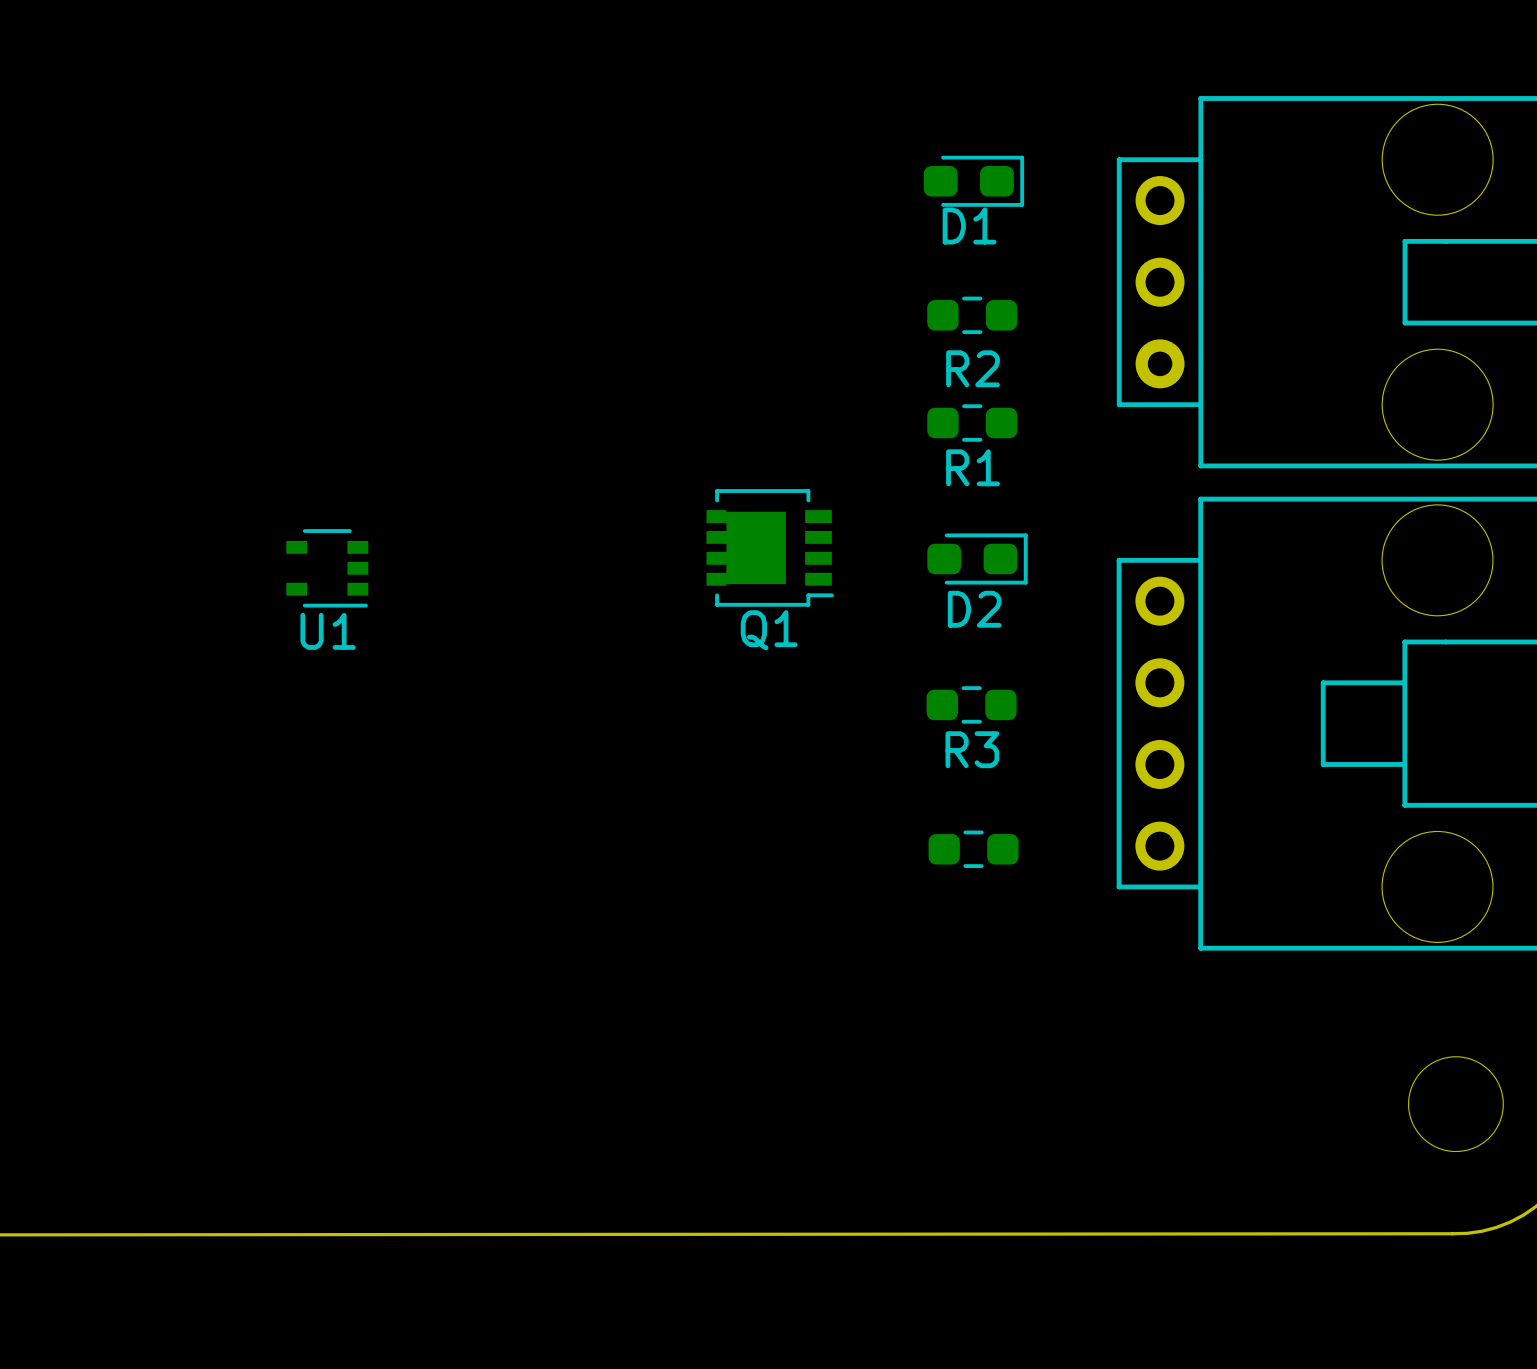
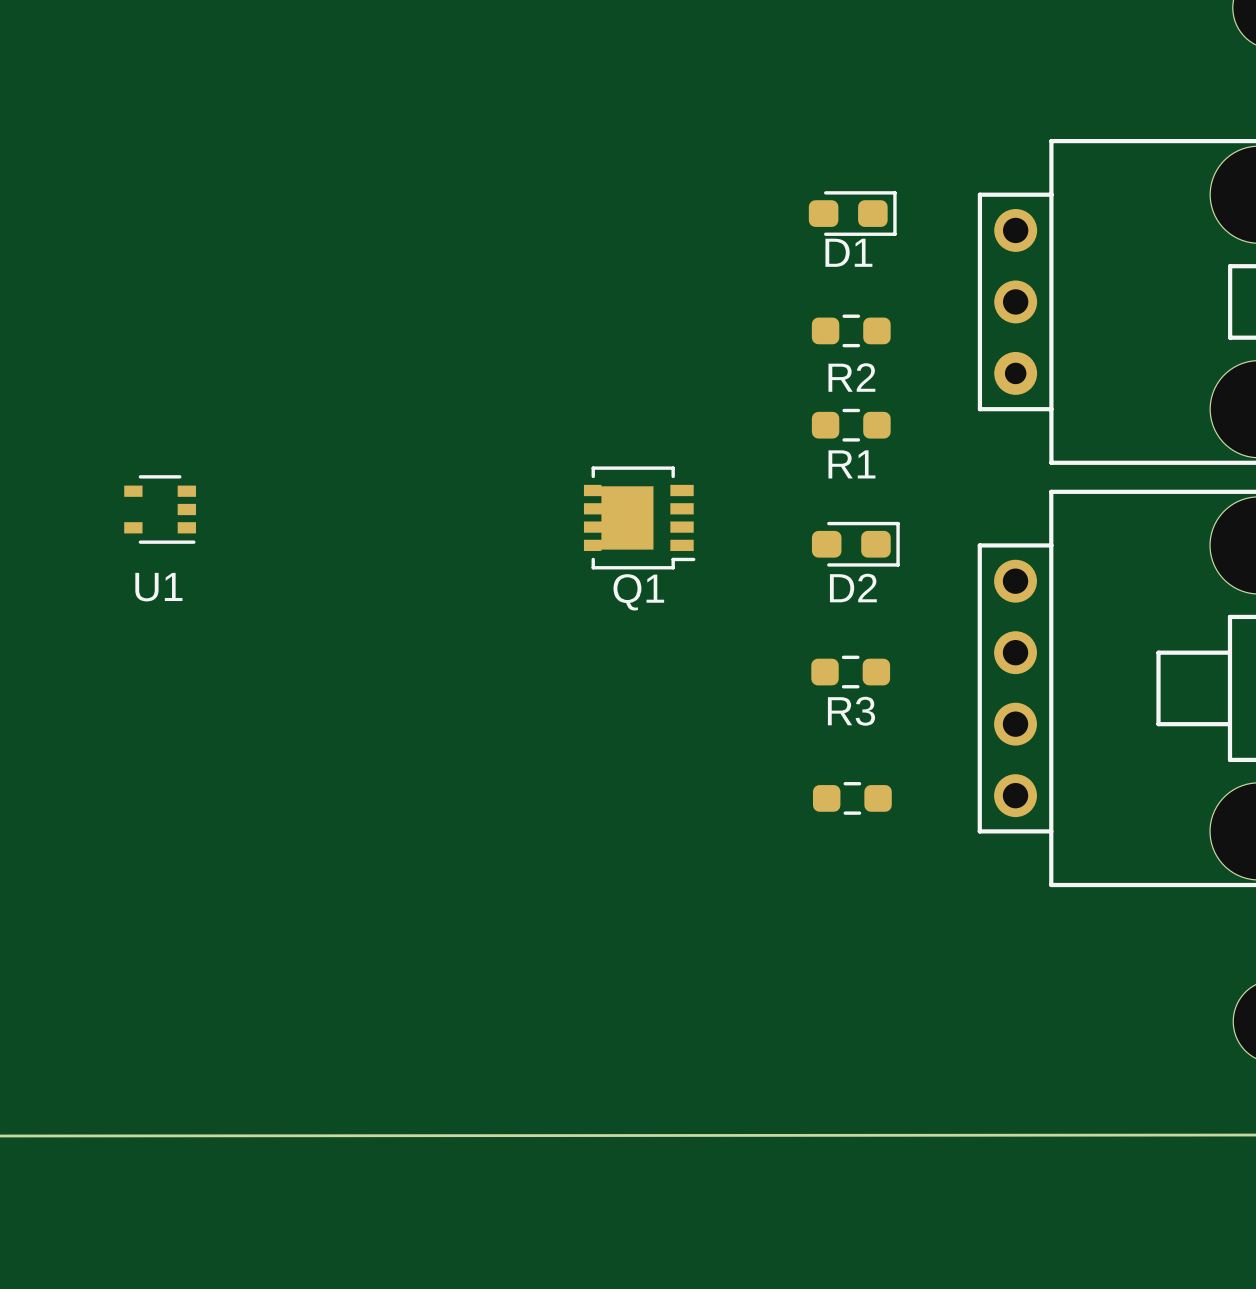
Q1 position: (770, 547) -> (639, 517)
U1 position: (327, 568) -> (160, 509)
U1 name position: U1 (328, 631) -> U1 (158, 587)

